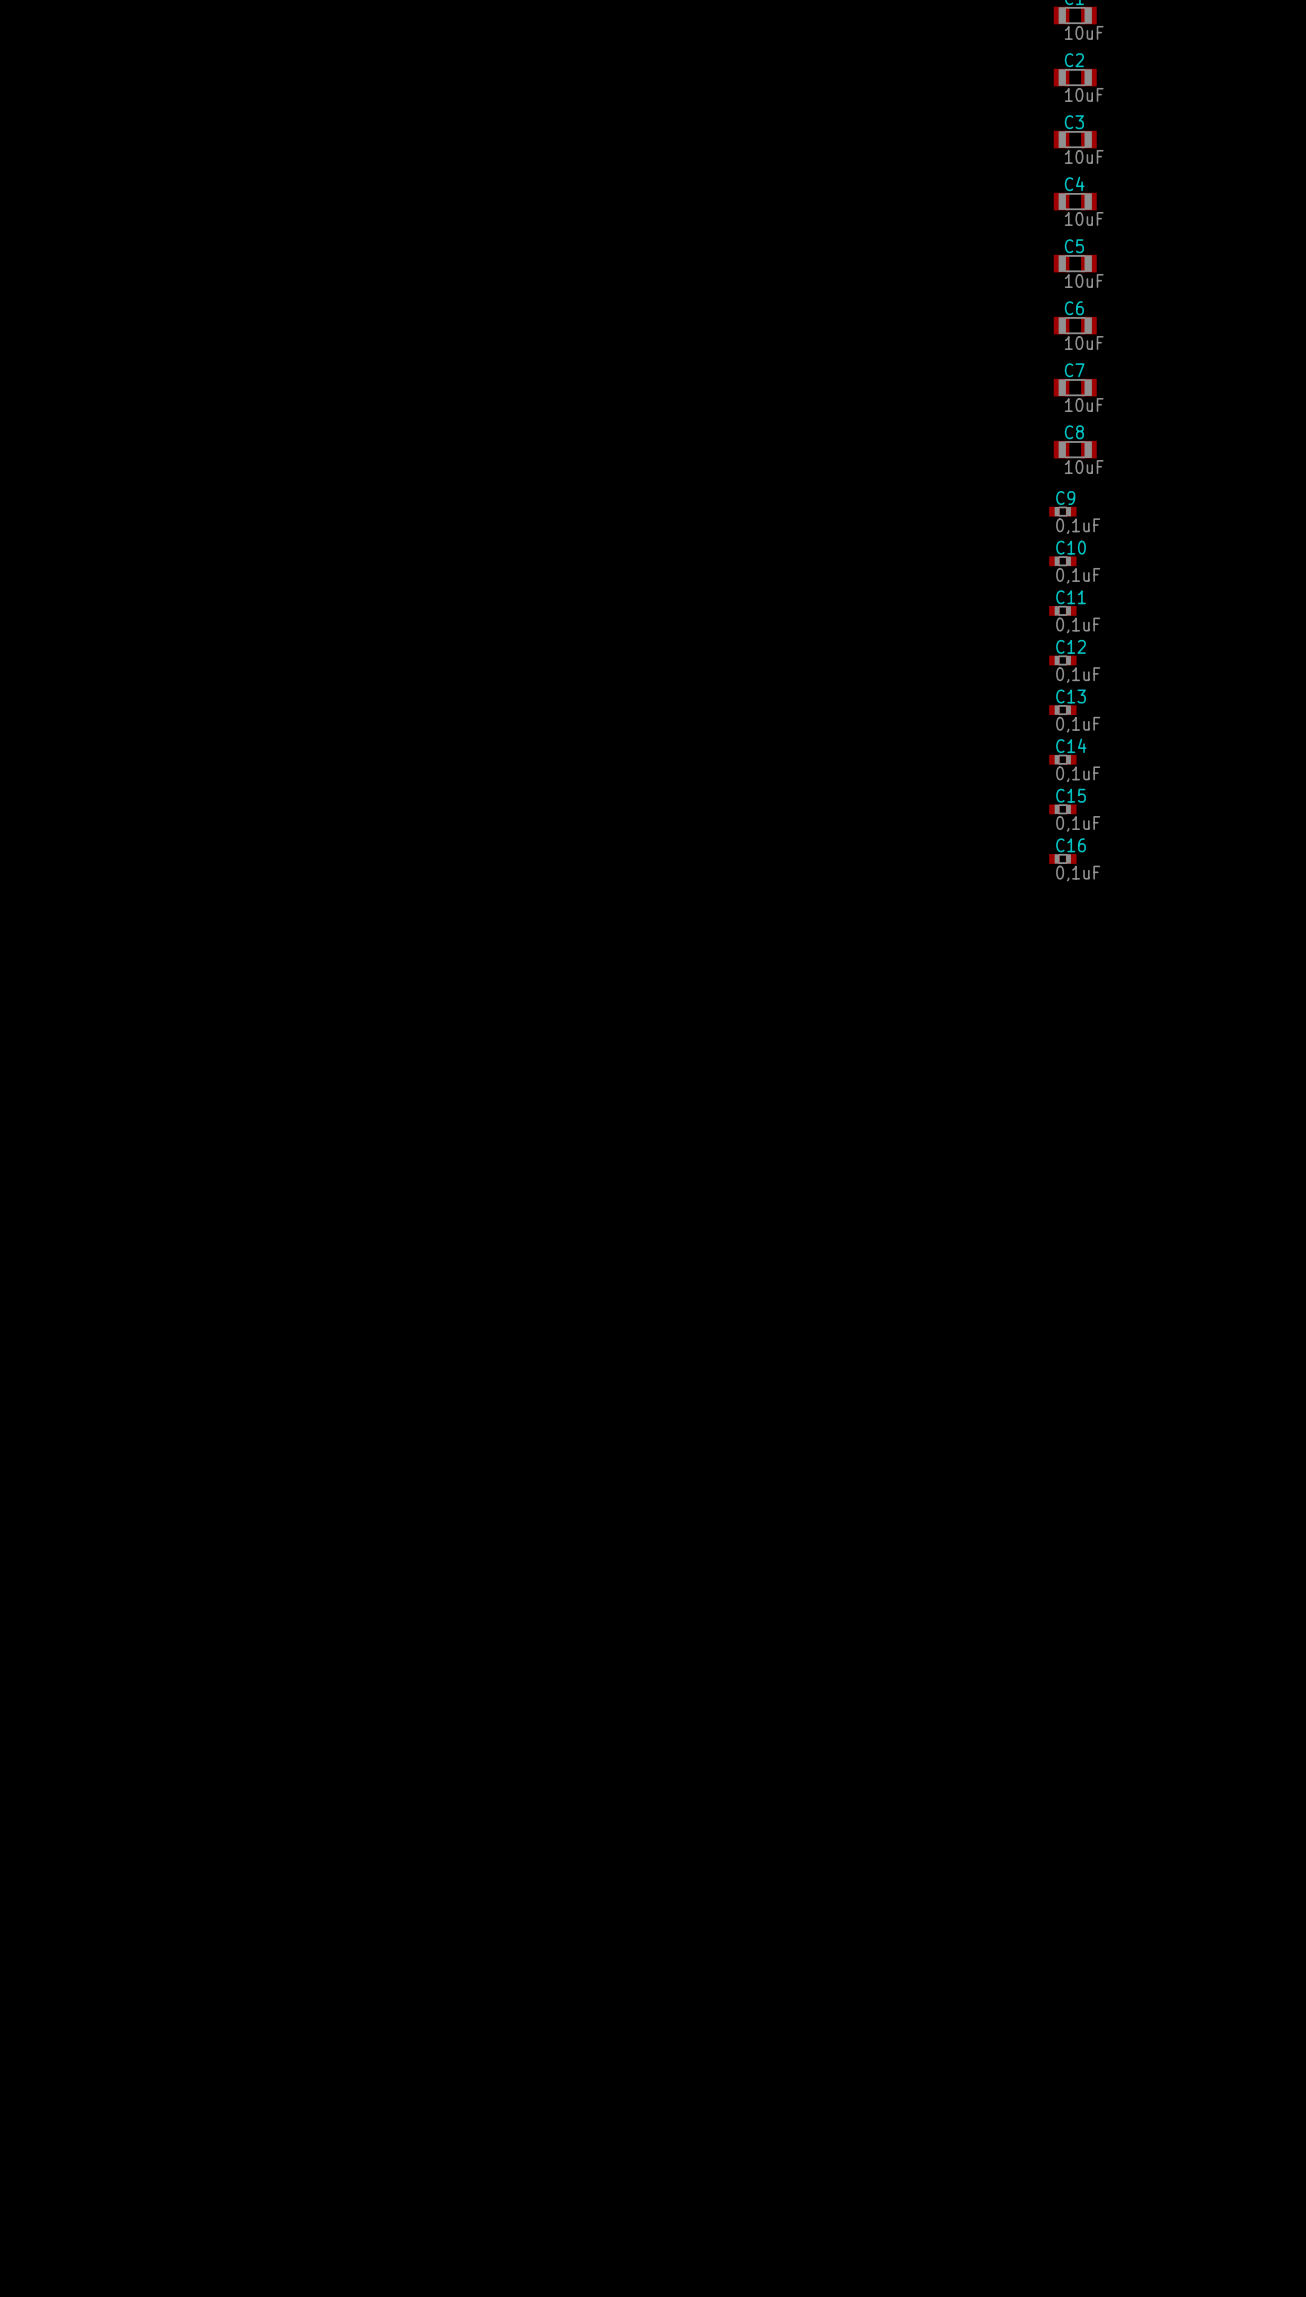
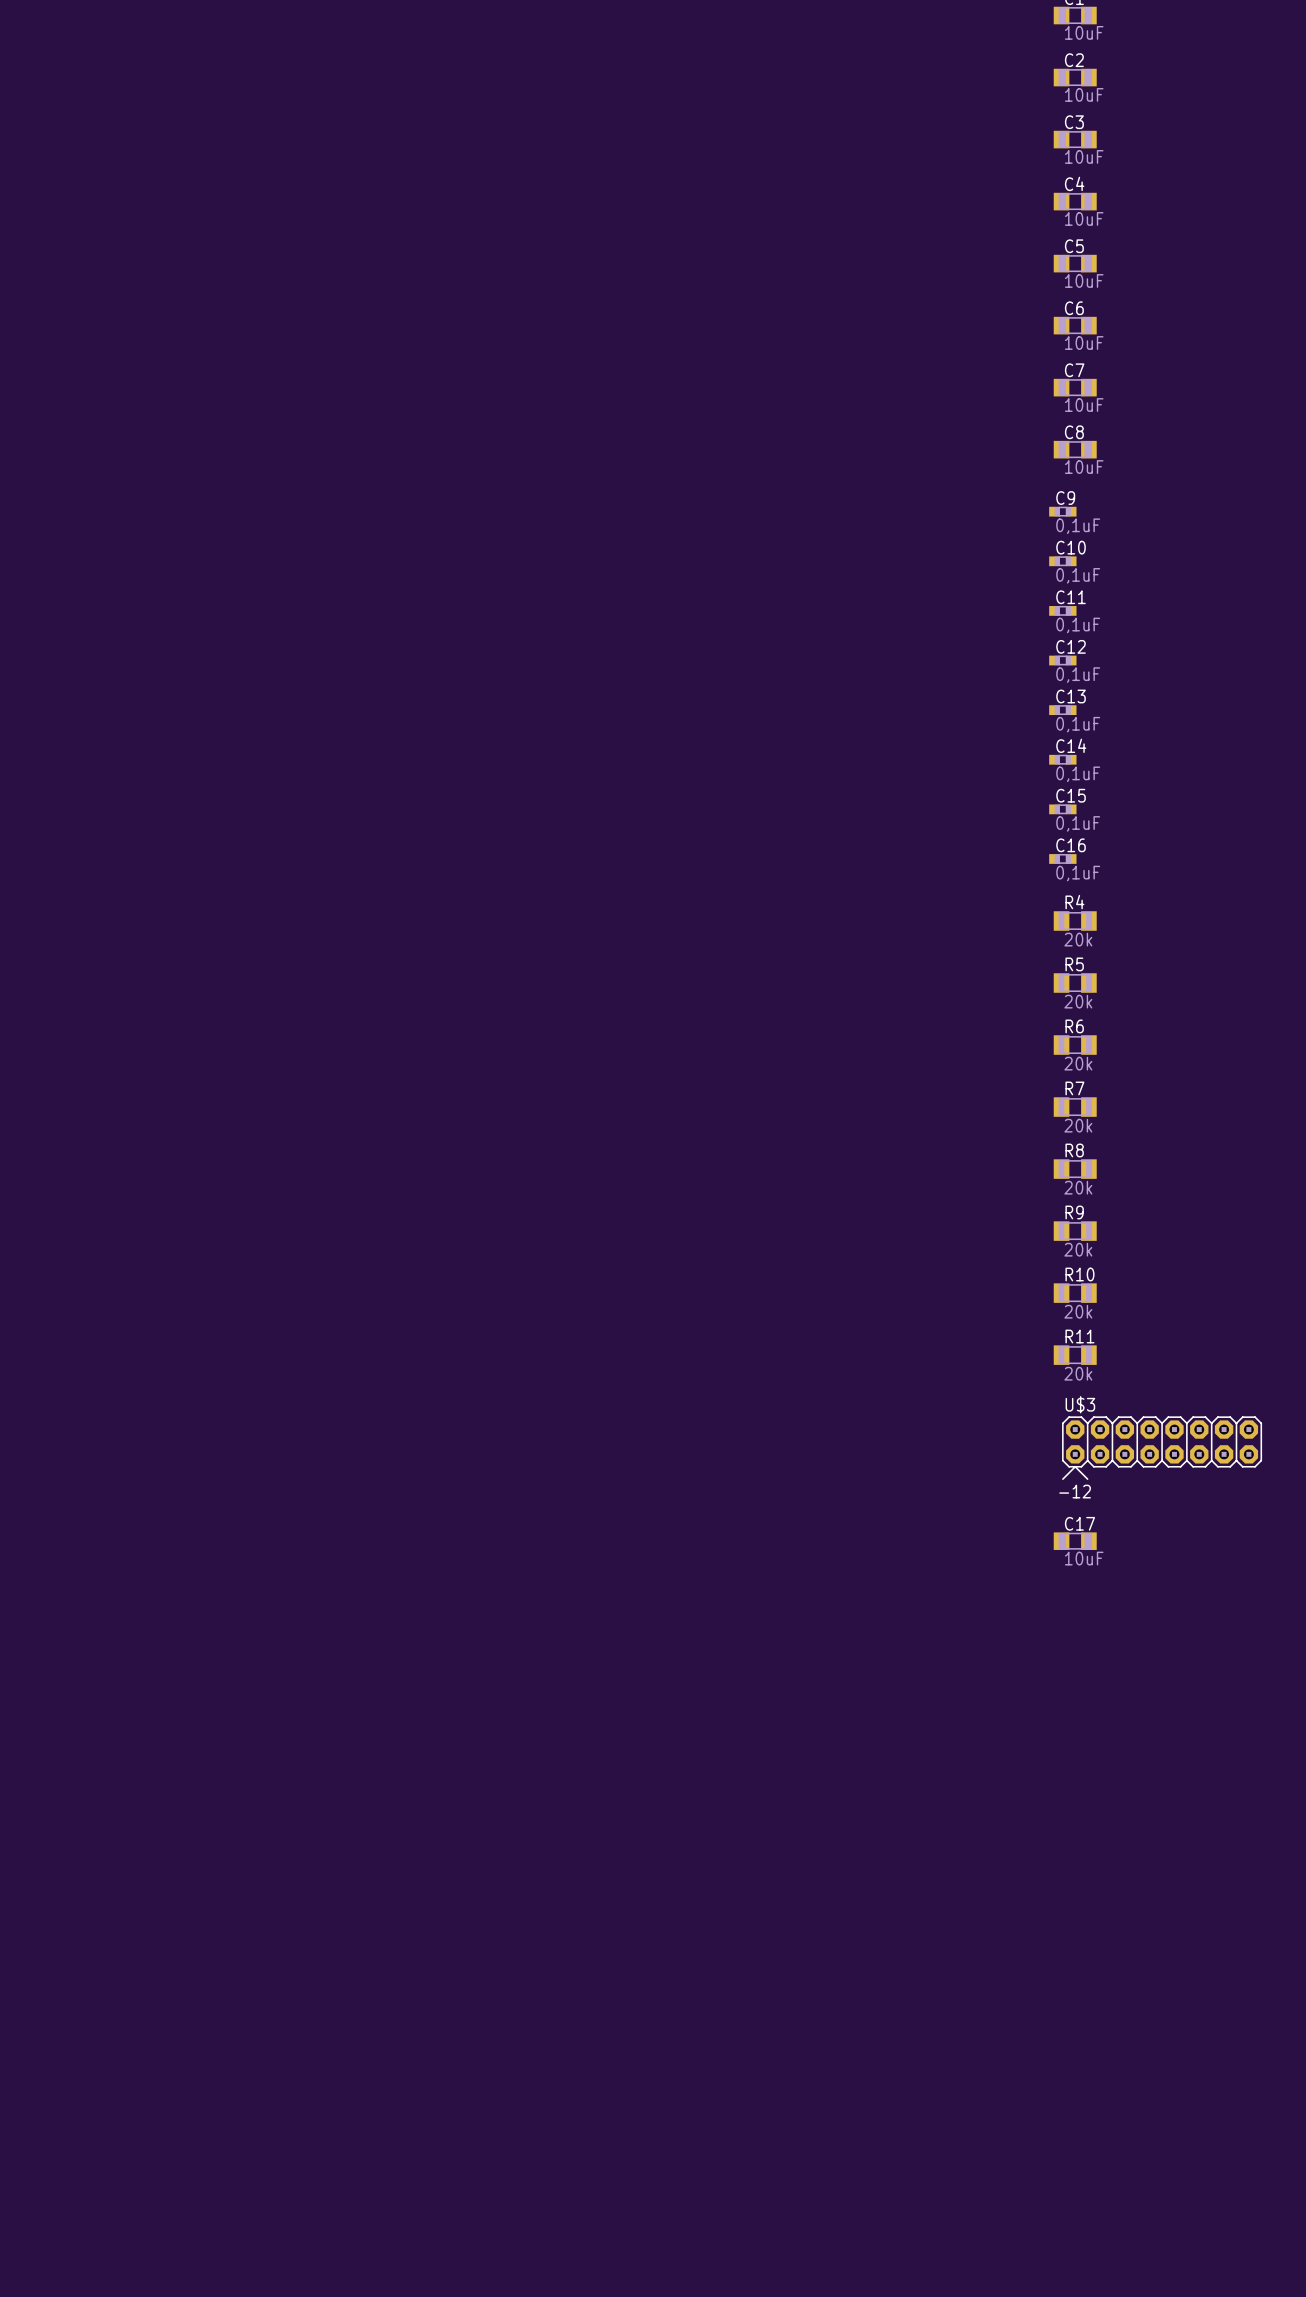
R4: none -> 20k (1075, 921)
R5: none -> 20k (1075, 983)
R6: none -> 20k (1075, 1045)
R7: none -> 20k (1075, 1107)
R8: none -> 20k (1075, 1169)
R9: none -> 20k (1075, 1231)
R10: none -> 20k (1075, 1293)
R11: none -> 20k (1075, 1355)
U$3: none -> (1162, 1448)
C17: none -> 10uF (1075, 1541)

